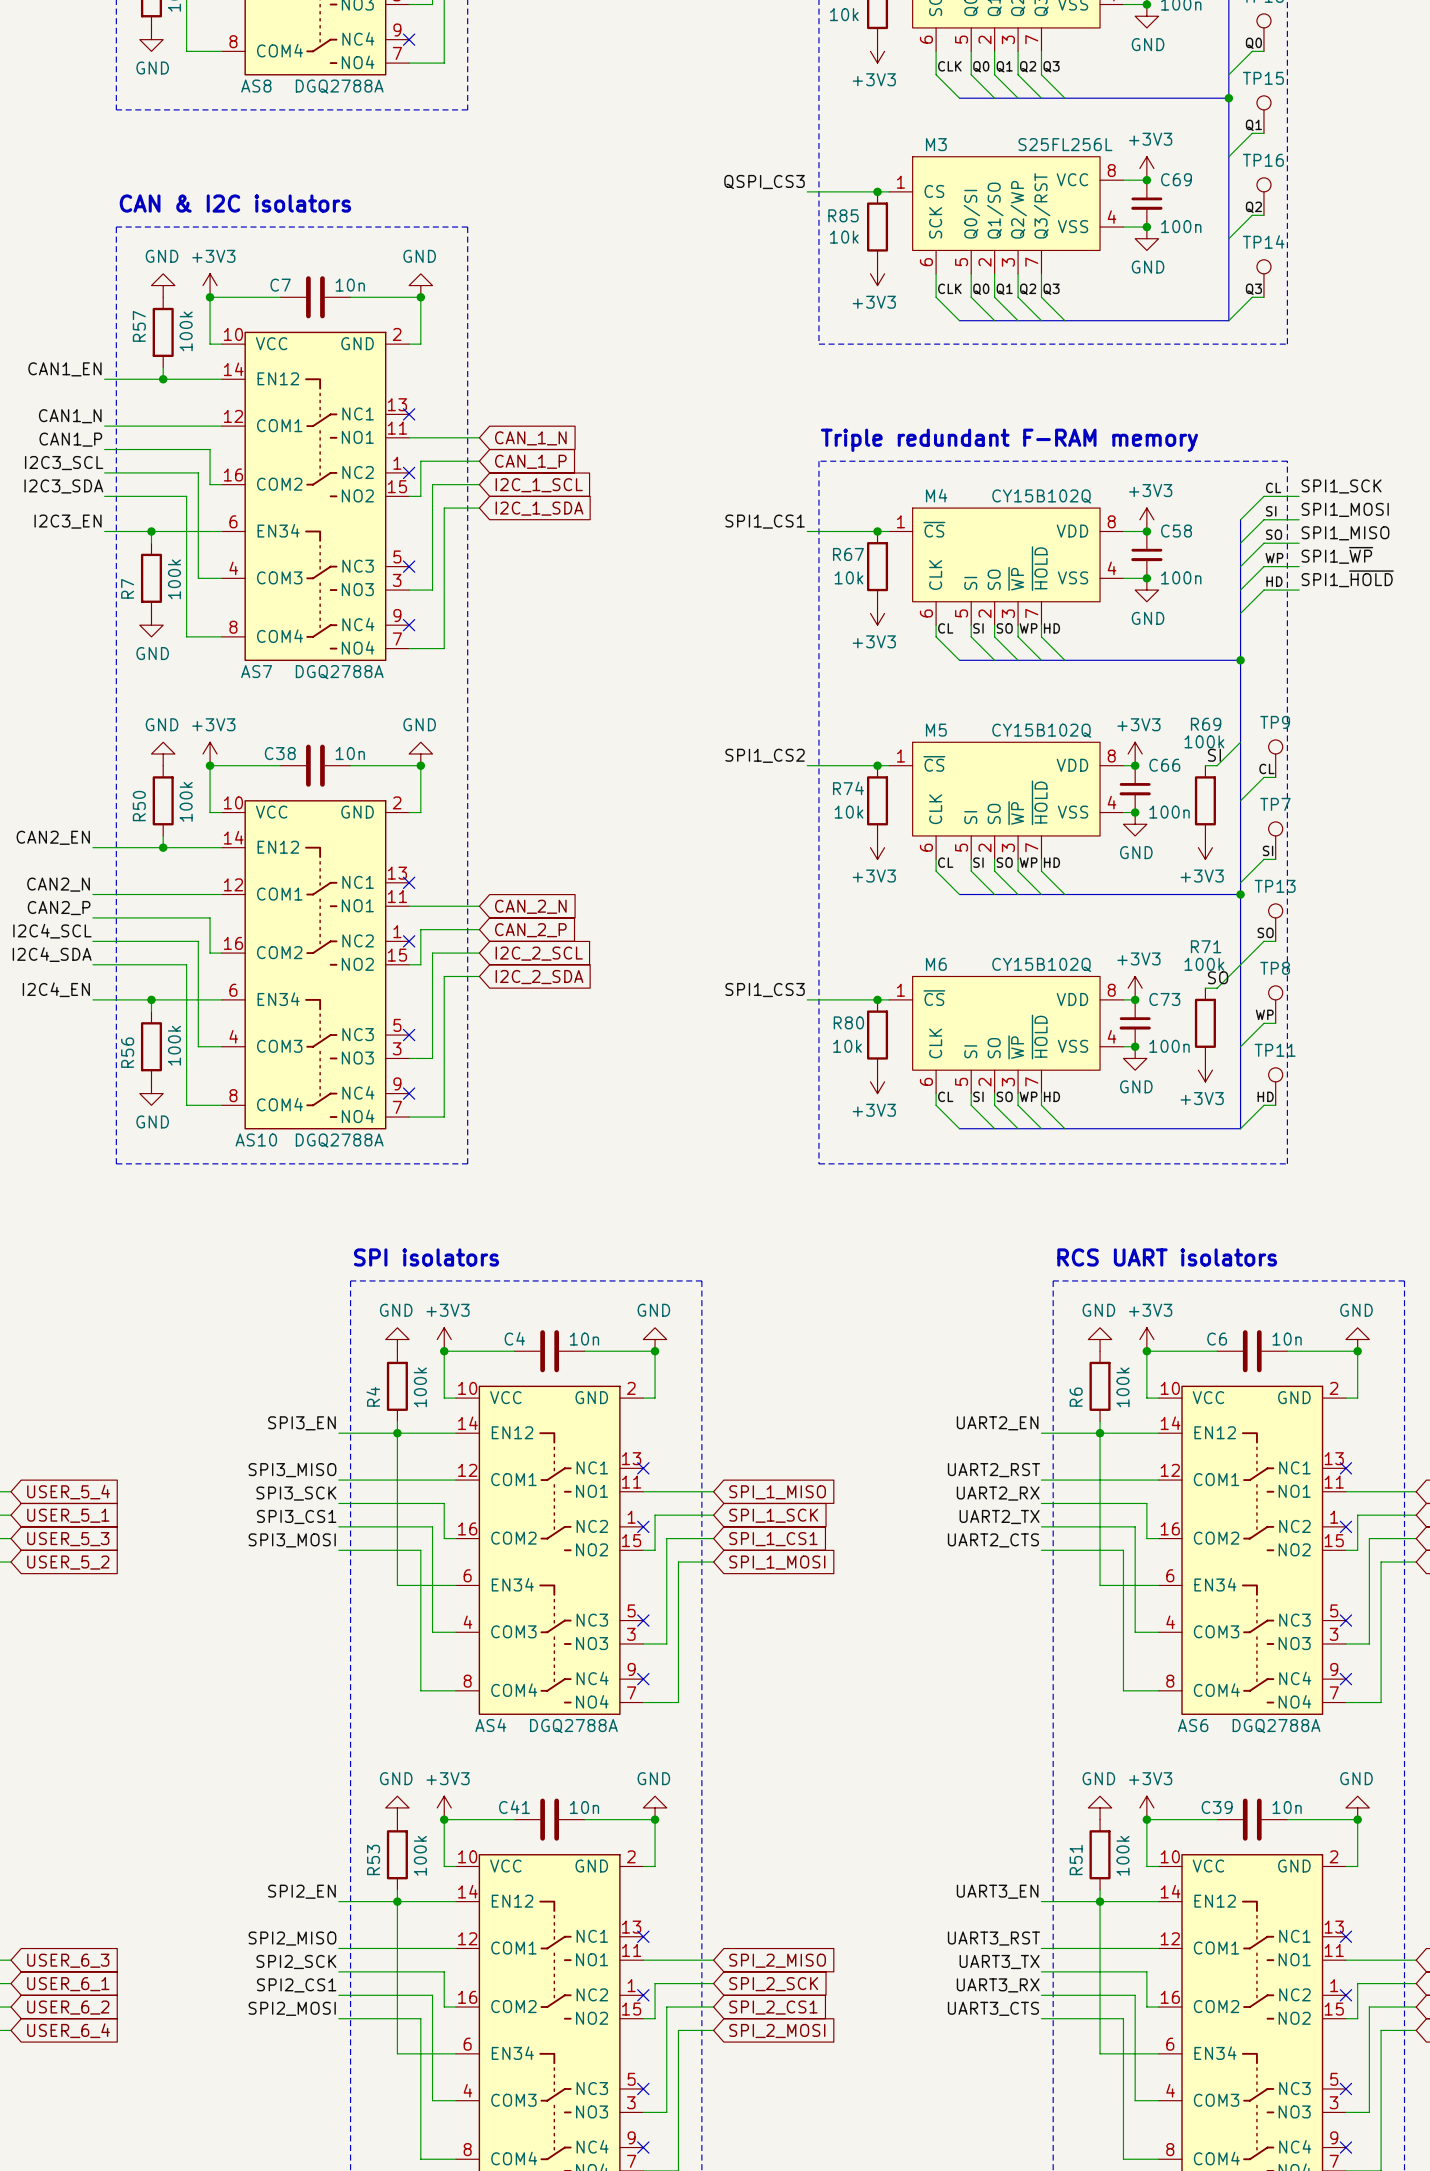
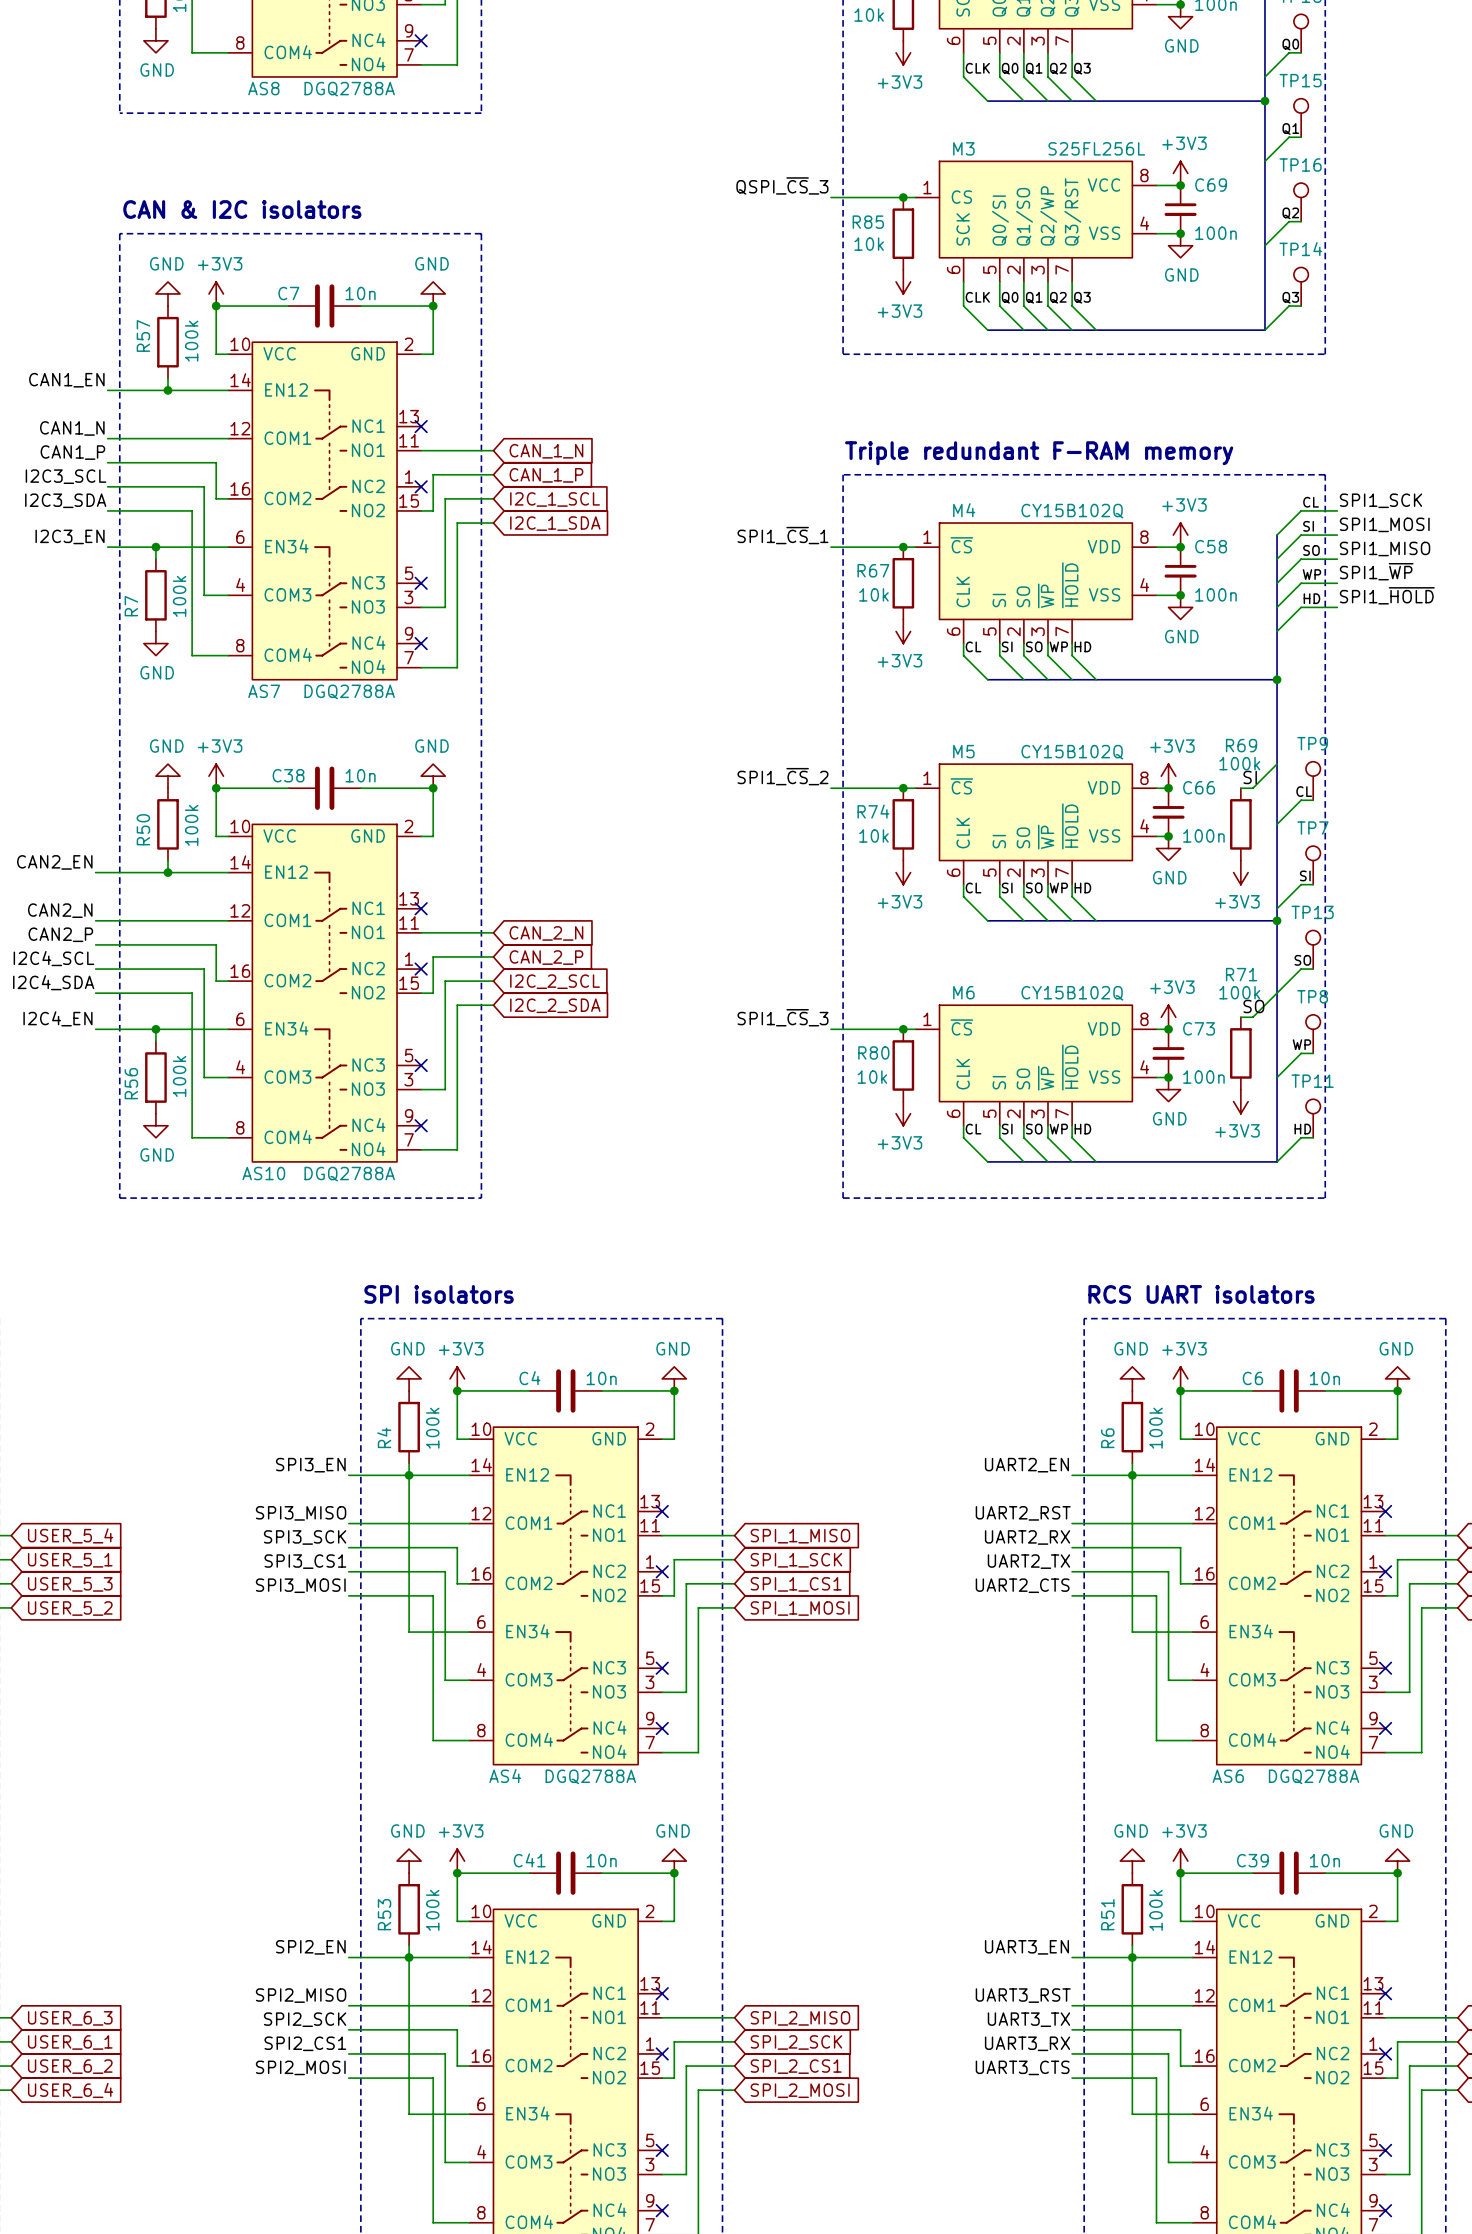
label: QSPI_CS3 (764, 181) -> QSPI_~{CS}_3 (782, 185)
label: SPI1_CS1 (765, 521) -> SPI1_~{CS}_1 (782, 535)
label: SPI1_CS2 (765, 755) -> SPI1_~{CS}_2 (782, 776)
label: SPI1_CS3 (765, 990) -> SPI1_~{CS}_3 (782, 1017)

